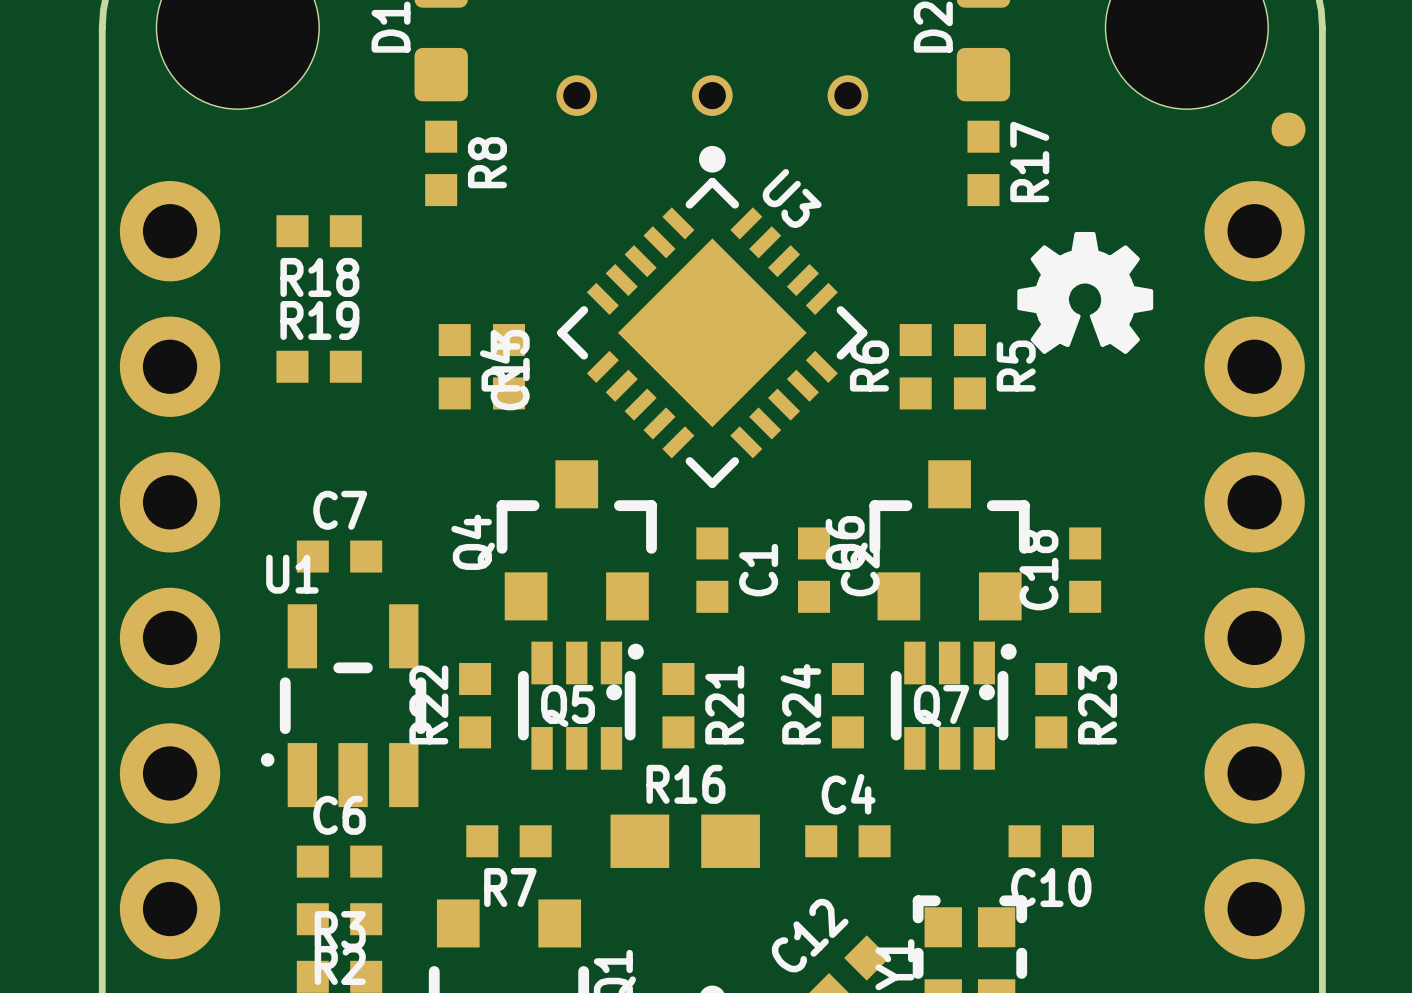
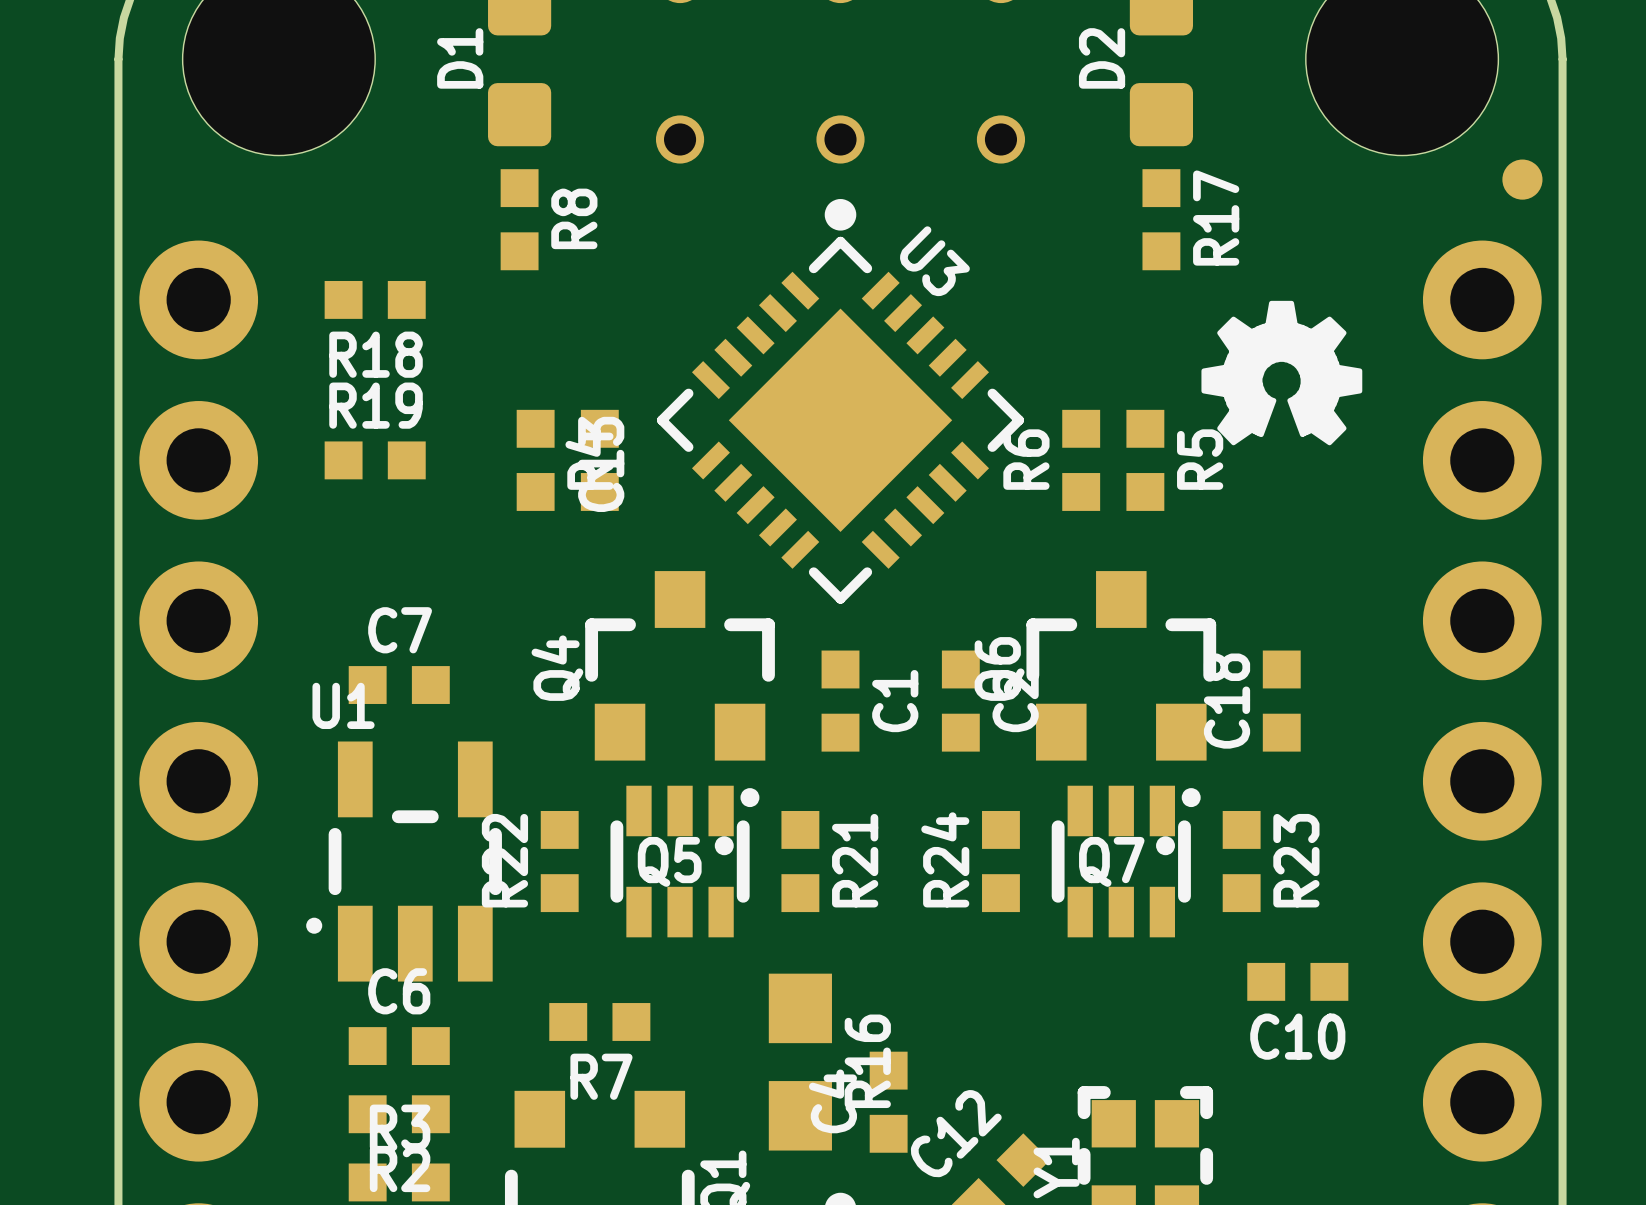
R16 rotation: 0° (685, 841) -> 90° clockwise (800, 1062)
C4 rotation: 0° (847, 841) -> 90° clockwise (888, 1102)
C4 position: (847, 841) -> (888, 1102)
C10 position: (1051, 841) -> (1297, 981)

